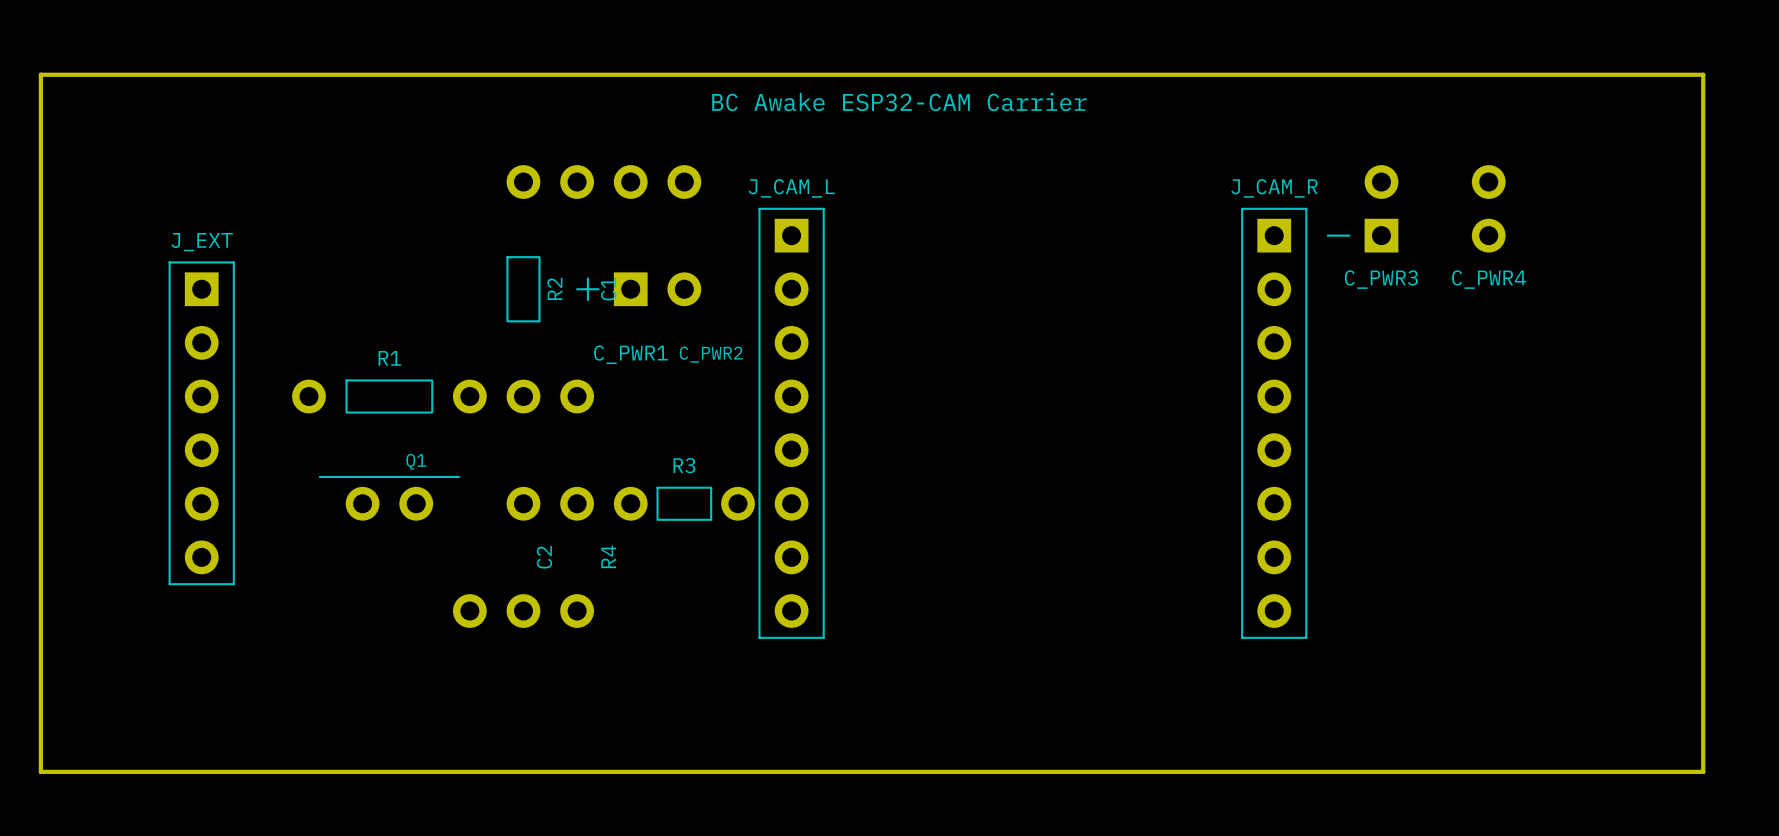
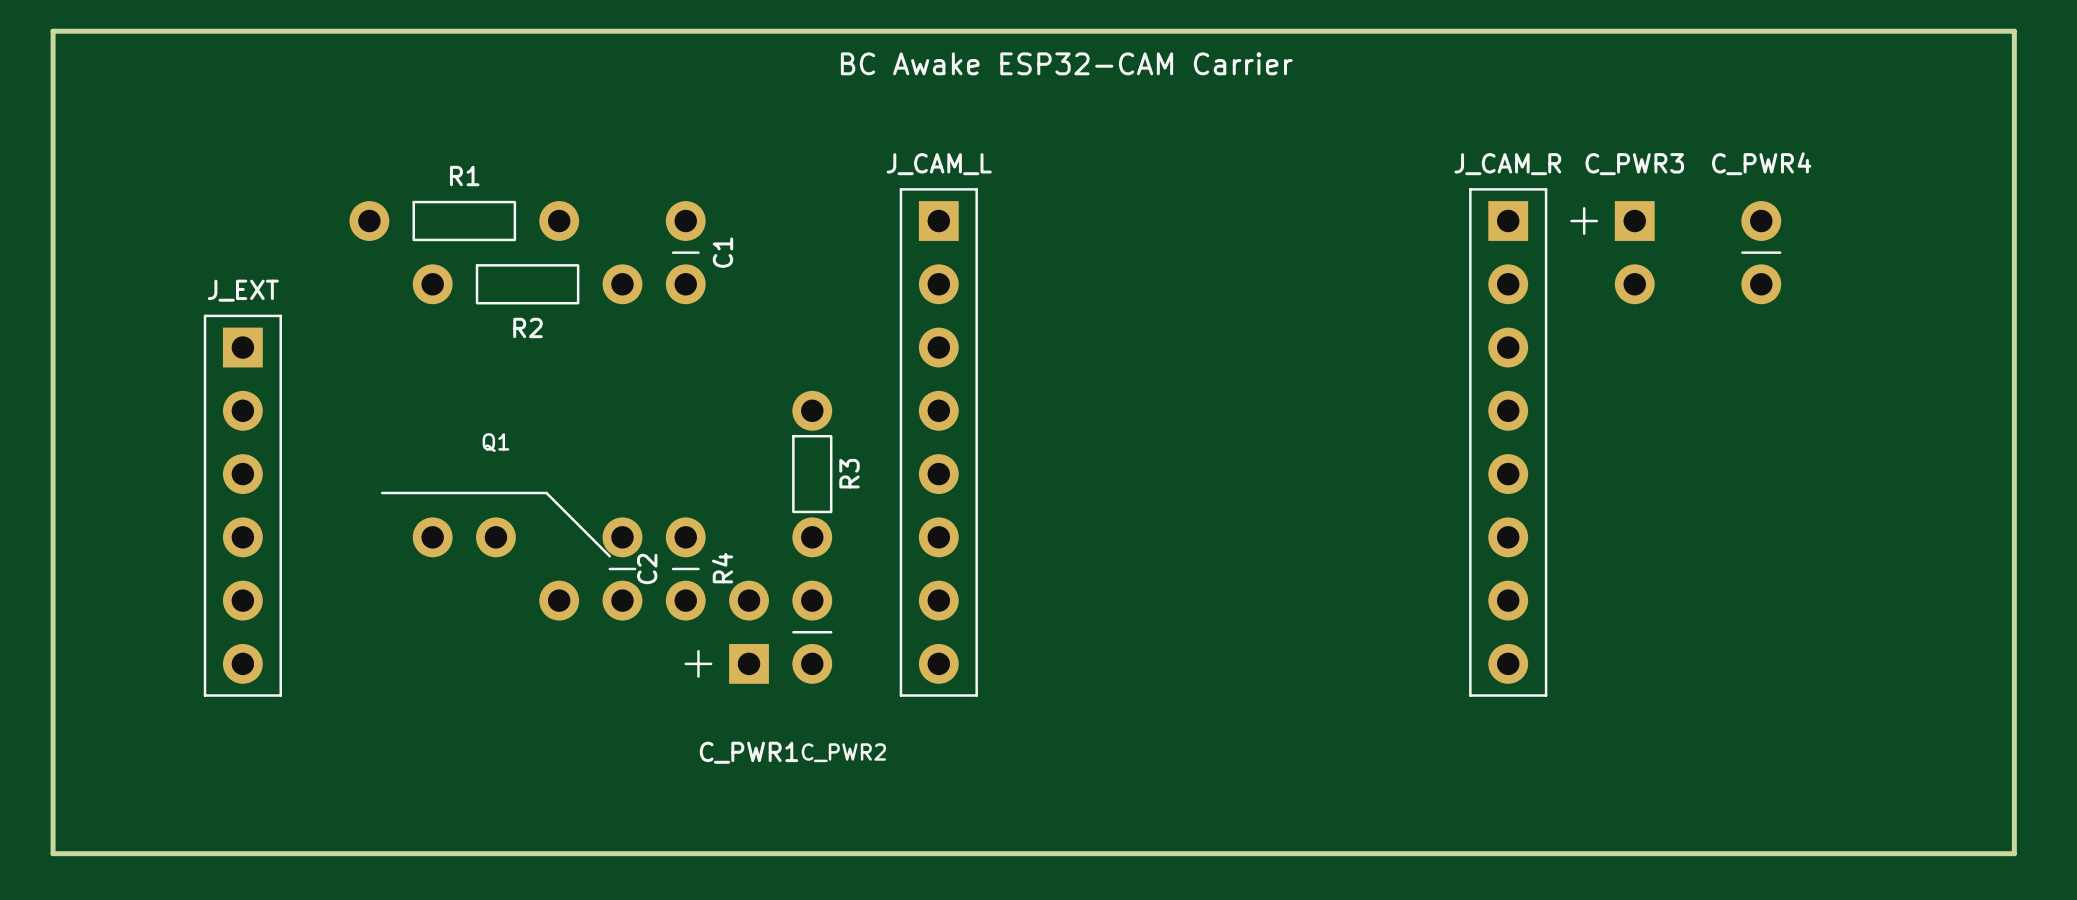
R2 footprint: [506, 165, 541, 414] -> [412, 264, 643, 305]
C1 footprint: [560, 165, 594, 414] -> [665, 201, 706, 305]
C_PWR1 footprint: [576, 165, 648, 307] -> [684, 580, 769, 684]
C_PWR2 footprint: [667, 165, 702, 307] -> [792, 580, 833, 684]
C_PWR3 footprint: [1326, 165, 1399, 253] -> [1570, 201, 1655, 305]
C_PWR4 footprint: [1471, 165, 1506, 253] -> [1741, 201, 1782, 305]
C_PWR3 name position: C_PWR3 (1381, 279) -> C_PWR3 (1634, 164)
C_PWR4 name position: C_PWR4 (1489, 279) -> C_PWR4 (1761, 163)
R2 name position: R2 (554, 288) -> R2 (527, 327)
R1 position: (389, 396) -> (464, 221)
J_EXT position: (201, 423) -> (242, 505)
R3 name position: R3 (684, 465) -> R3 (849, 473)
Q1 footprint: [318, 475, 487, 628] -> [380, 491, 612, 621]
C2 footprint: [506, 486, 541, 628] -> [602, 517, 643, 621]
R4 footprint: [560, 486, 594, 628] -> [665, 517, 706, 621]
R3 footprint: [613, 486, 755, 521] -> [792, 390, 833, 558]

